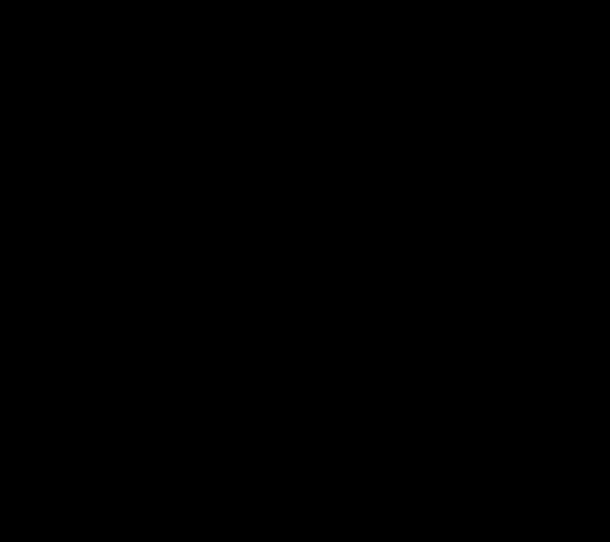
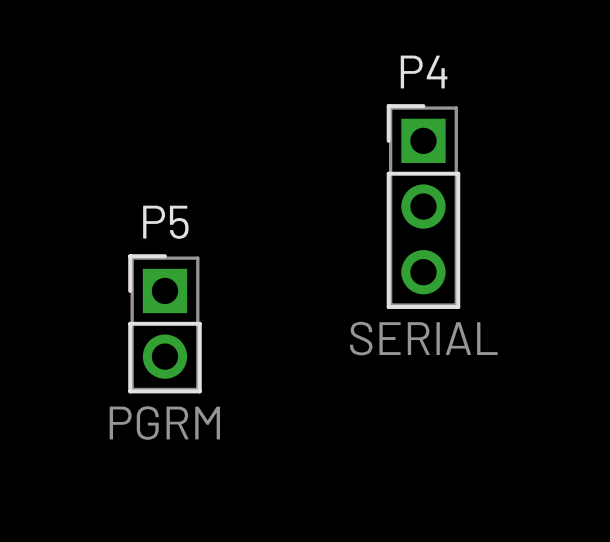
P4: none -> SERIAL (423, 206)
P5: none -> PGRM (164, 323)

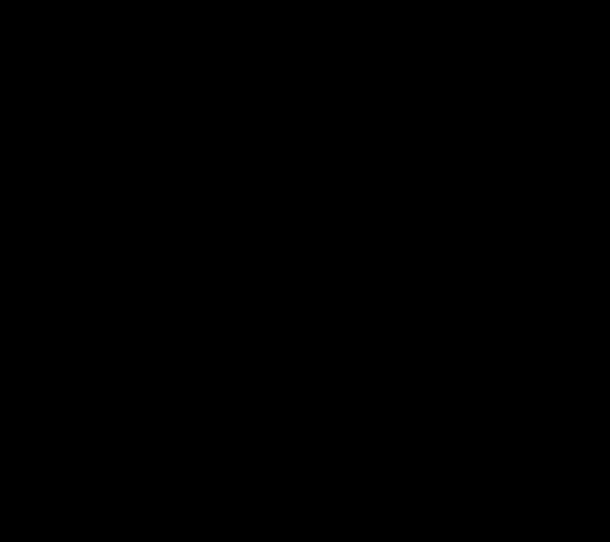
P4: SERIAL (423, 206) -> none
P5: PGRM (164, 323) -> none

